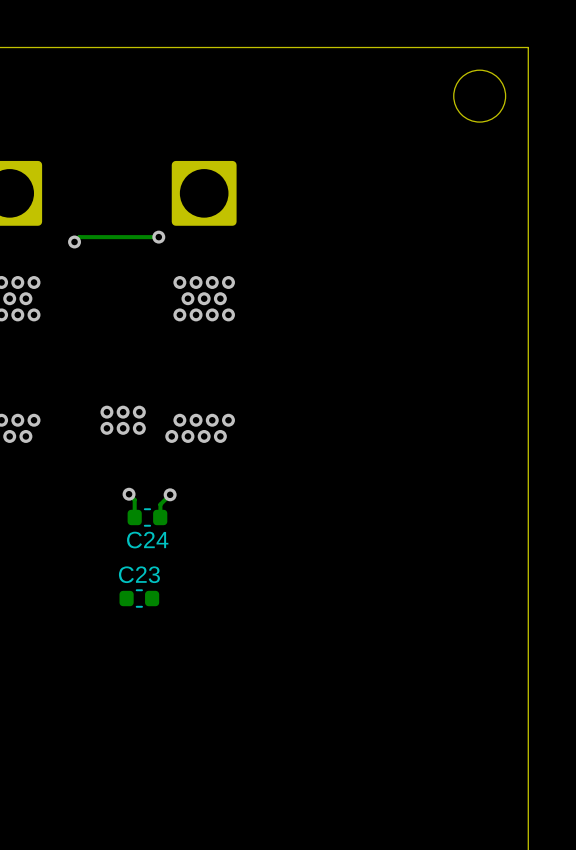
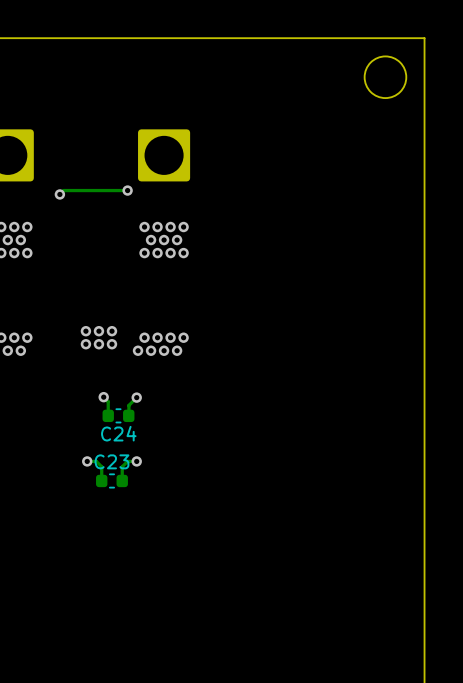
track: none -> (87, 461) (96, 461) (101, 466) (101, 480)
via: none -> (87, 461)
track: none -> (136, 461) (127, 461) (122, 466) (122, 480)
via: none -> (136, 461)

